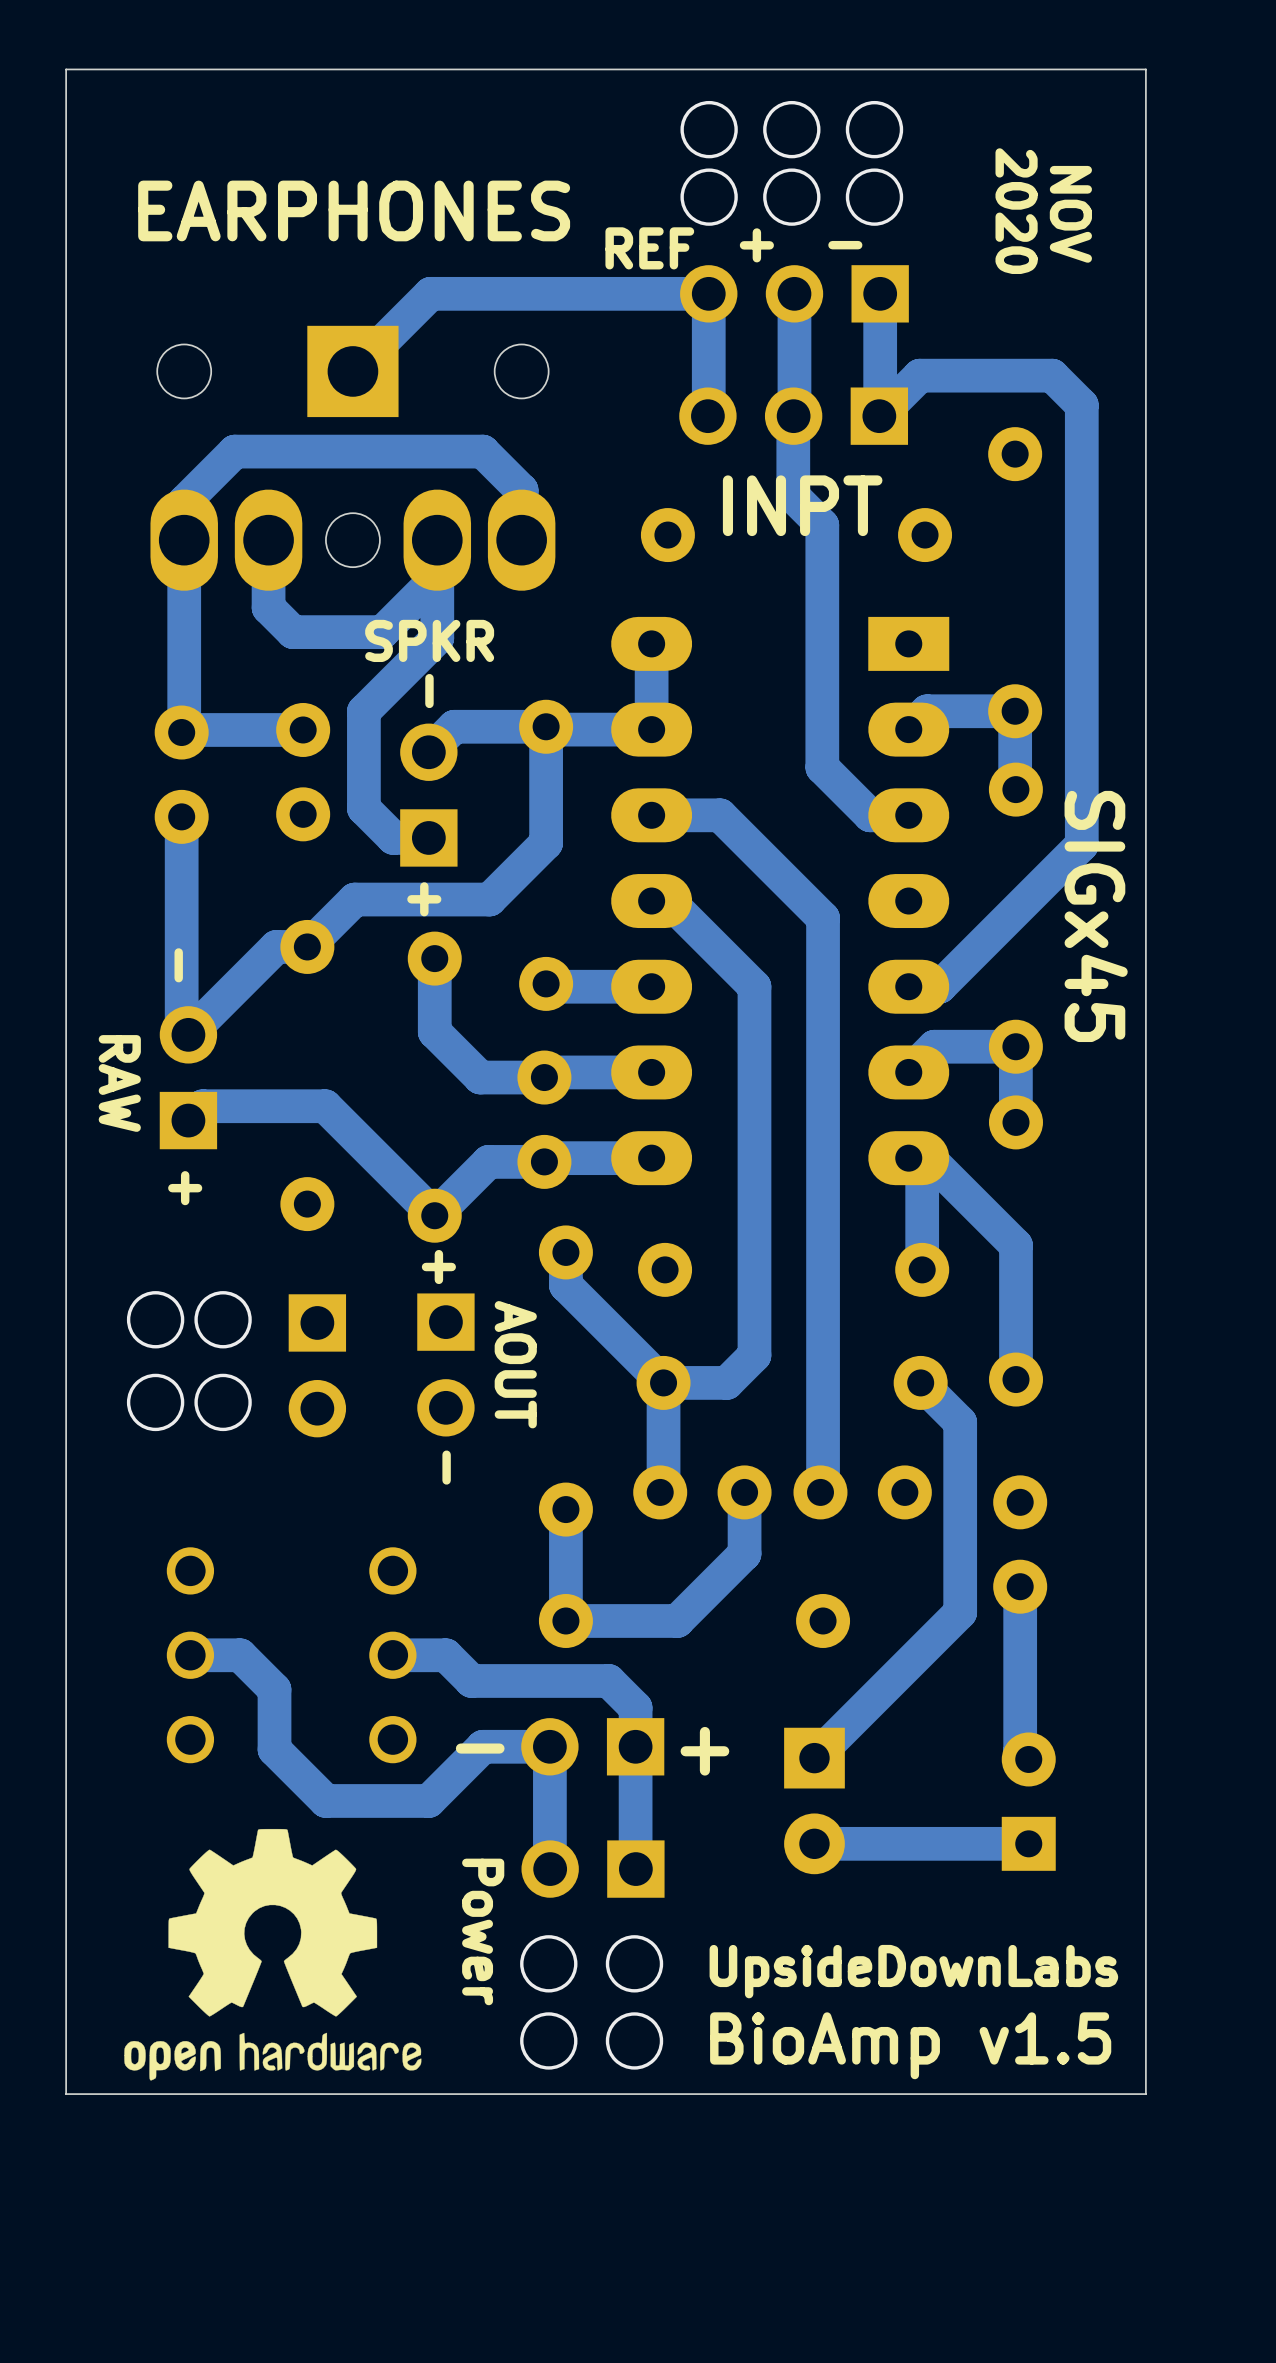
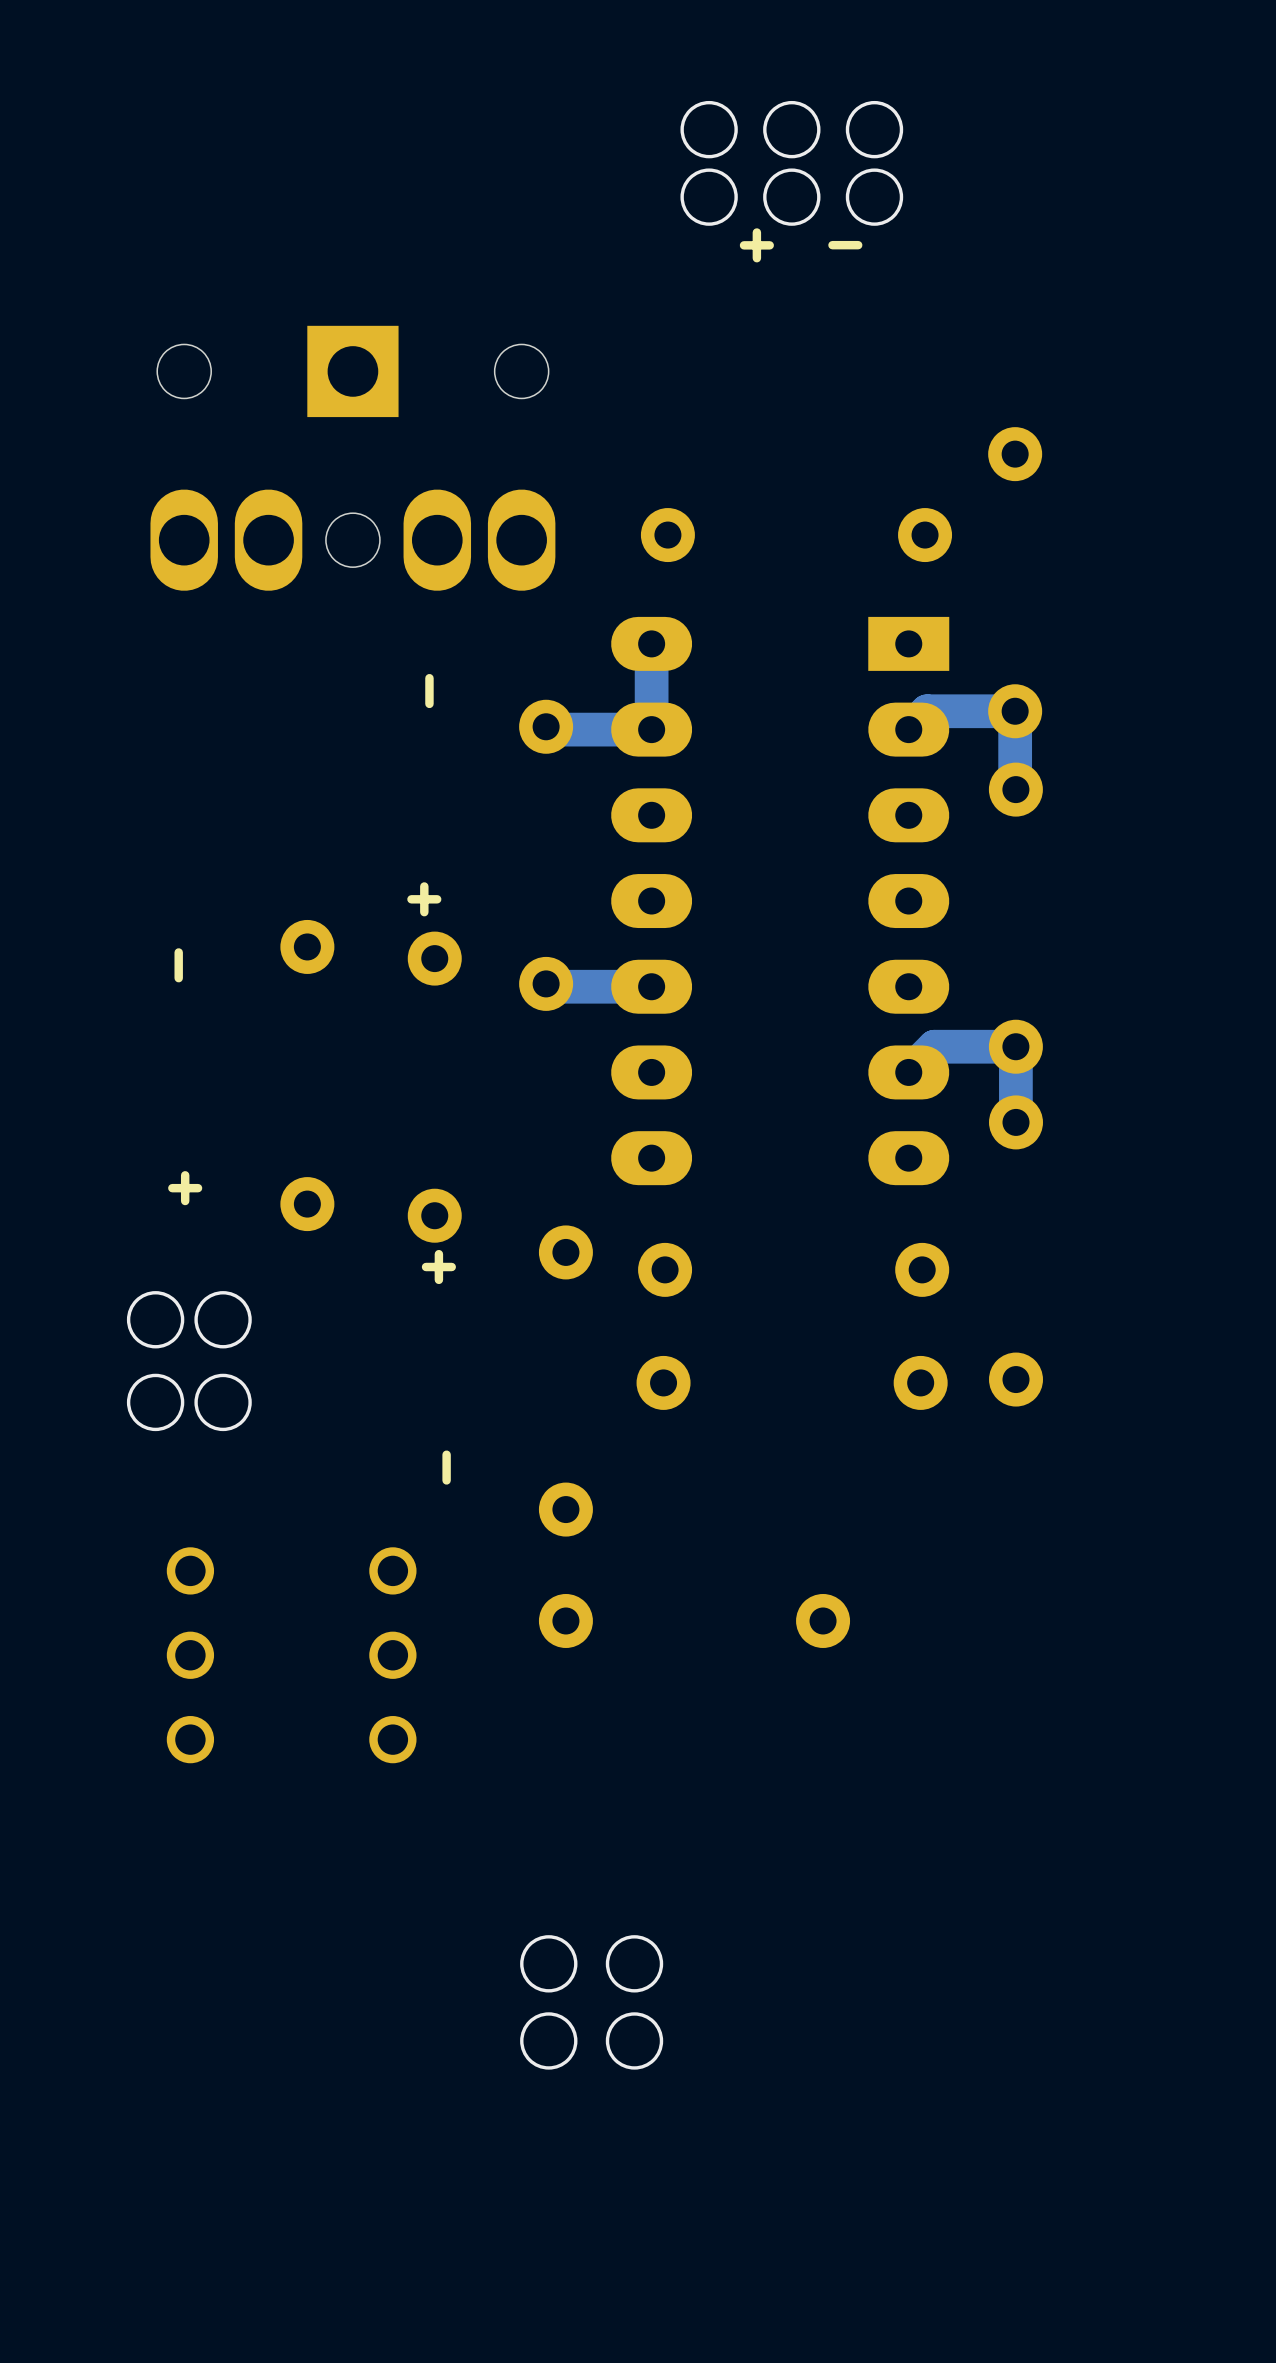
board edge: (1145, 69) (1145, 2094) (66, 2094) (66, 69) (1145, 69) -> none
text: EARPHONES (354, 210) -> none
text: 2020 (1016, 211) -> none
text: NOV (1070, 214) -> none
text: REF (649, 248) -> none
track: (794, 293) (793, 496) (822, 525) (822, 767) (870, 815) (908, 815) -> none
part: (794, 293) -> none
track: (880, 293) (880, 415) -> none
track: (352, 371) (430, 293) (708, 293) (707, 416) -> none
part: (793, 416) -> none
track: (879, 416) (919, 375) (1052, 375) (1081, 405) (1081, 844) (939, 986) (908, 986) -> none
text: INPT (802, 505) -> none
track: (268, 540) (268, 607) (293, 632) (382, 632) (437, 577) -> none
track: (437, 540) (437, 638) (363, 711) (363, 808) (393, 837) (428, 837) -> none
track: (521, 540) (521, 490) (482, 451) (234, 451) (184, 502) (184, 729) -> none
text: SPKR (429, 640) -> none
track: (303, 729) (184, 729) -> none
track: (428, 752) (454, 726) (546, 726) (546, 843) (489, 899) (354, 899) (307, 946) (276, 946) (188, 1034) (181, 1028) (181, 816) -> none
part: (303, 772) -> none
part: (181, 774) -> none
part: (428, 795) -> none
track: (660, 815) (651, 815) (720, 815) (823, 918) (823, 1489) (820, 1492) -> none
track: (651, 901) (668, 901) (754, 986) (754, 1355) (726, 1382) (663, 1382) -> none
text: SIGx45 (1096, 916) -> none
track: (434, 958) (434, 1031) (480, 1077) (544, 1077) (549, 1072) (677, 1072) -> none
part: (188, 1077) -> none
text: RAW (119, 1083) -> none
part: (544, 1119) -> none
track: (188, 1120) (202, 1106) (325, 1106) (434, 1215) (488, 1161) (544, 1161) (548, 1158) (651, 1158) -> none
track: (565, 1252) (565, 1285) (663, 1382) -> none
track: (922, 1269) (922, 1171) (908, 1158) (928, 1158) (1016, 1245) (1016, 1379) -> none
part: (445, 1364) -> none
text: AOUT (515, 1364) -> none
part: (317, 1365) -> none
track: (663, 1382) (663, 1489) (660, 1492) -> none
track: (920, 1382) (960, 1422) (960, 1612) (814, 1758) -> none
part: (702, 1492) -> none
track: (744, 1492) (744, 1553) (677, 1620) (565, 1620) (565, 1509) -> none
part: (862, 1492) -> none
part: (1020, 1544) -> none
track: (1020, 1586) (1020, 1750) (1028, 1759) -> none
track: (190, 1655) (240, 1655) (274, 1689) (274, 1749) (325, 1800) (428, 1800) (482, 1746) (549, 1746) (549, 1868) -> none
track: (392, 1655) (445, 1655) (471, 1680) (608, 1680) (635, 1707) (635, 1868) -> none
part: (592, 1746) -> none
text: - (480, 1748) -> none
text: + (704, 1751) -> none
part: (814, 1800) -> none
part: (1028, 1801) -> none
drawing: [124, 1828, 422, 2081] -> none
track: (1028, 1843) (814, 1843) -> none
part: (593, 1869) -> none
text: Power (483, 1931) -> none
text: UpsideDownLabs (913, 1971) -> none
text: BioAmp v1.5 (910, 2045) -> none

